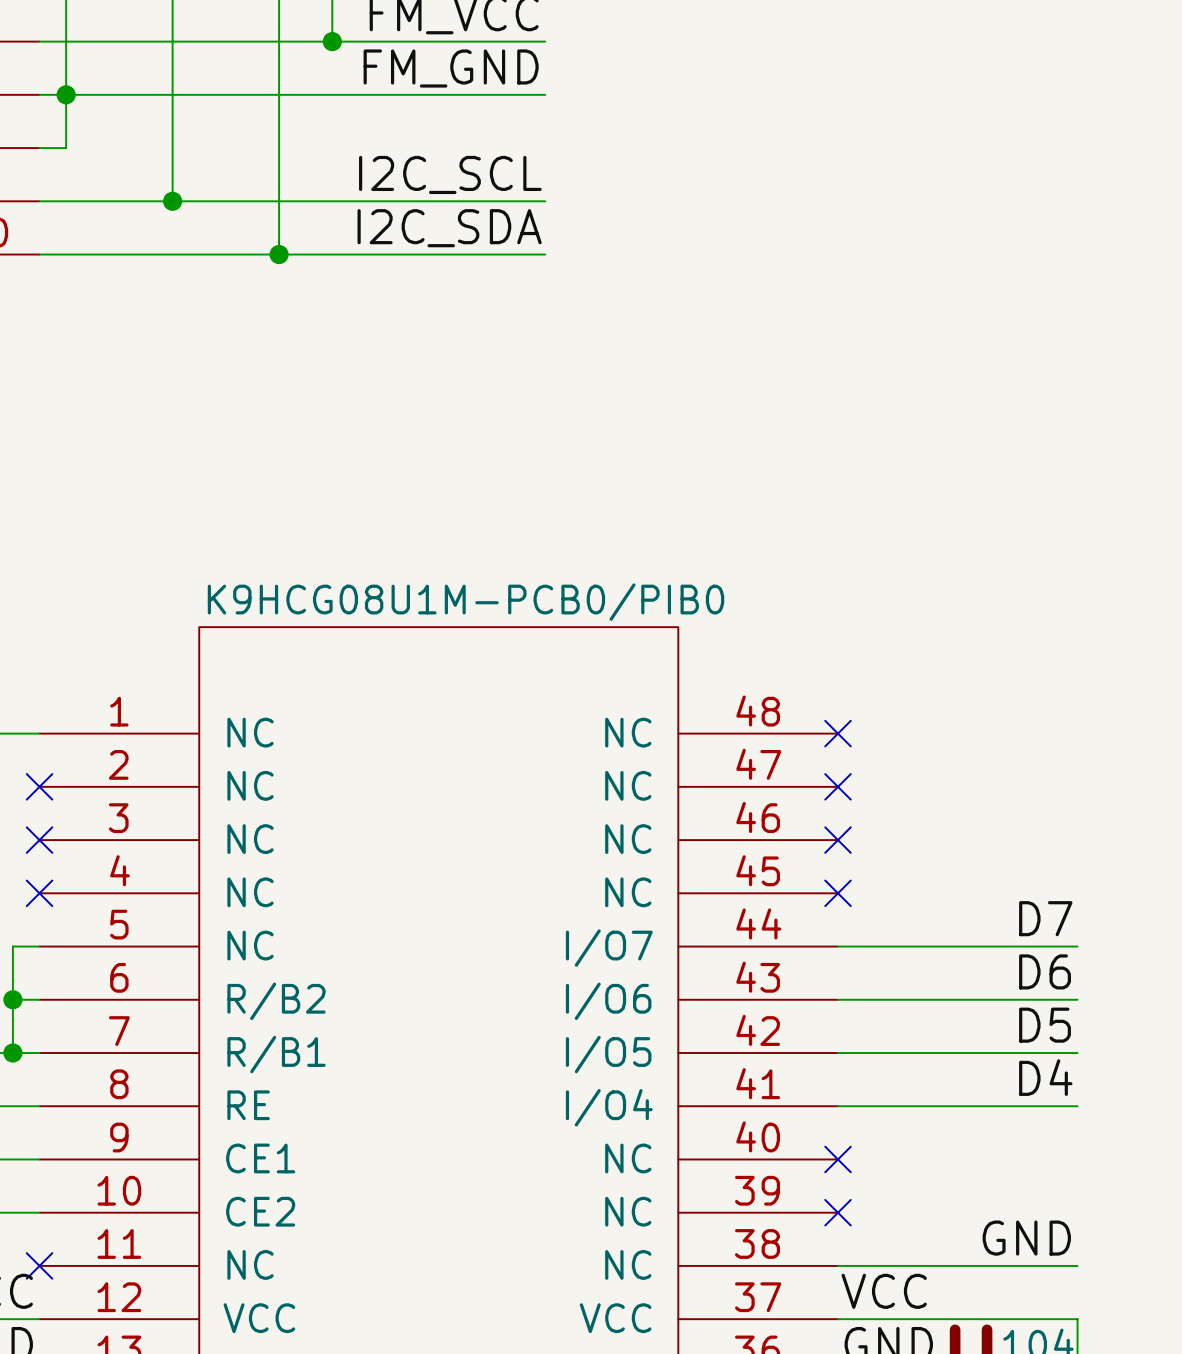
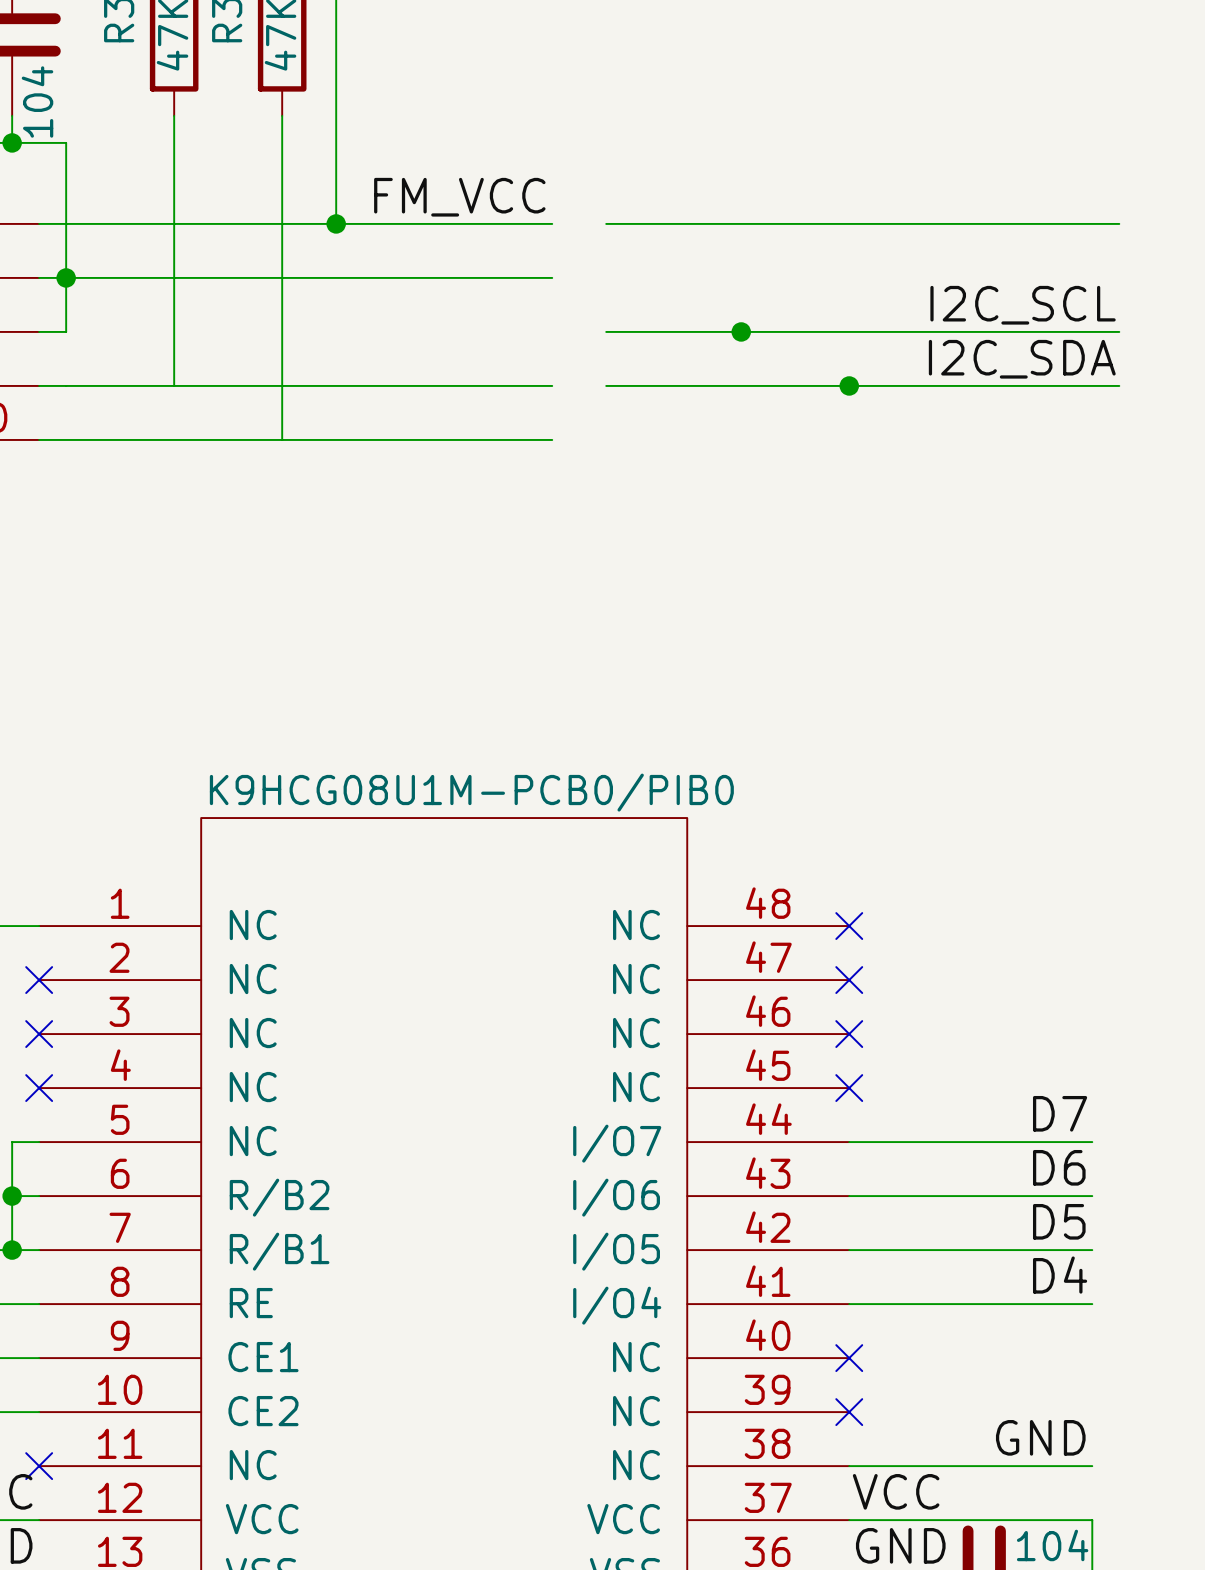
wire: none -> (606, 223) (1119, 223)
label: FM_GND (451, 68) -> none
label: none -> I2C_SCL (1023, 305)
wire: none -> (606, 331) (1119, 331)
junction: none -> (741, 331)
label: I2C_SCL (450, 174) -> none
label: none -> I2C_SDA (1022, 359)
junction: (172, 201) -> none
wire: none -> (606, 385) (1119, 385)
junction: none -> (849, 385)
label: I2C_SDA (449, 228) -> none
junction: (279, 254) -> none

